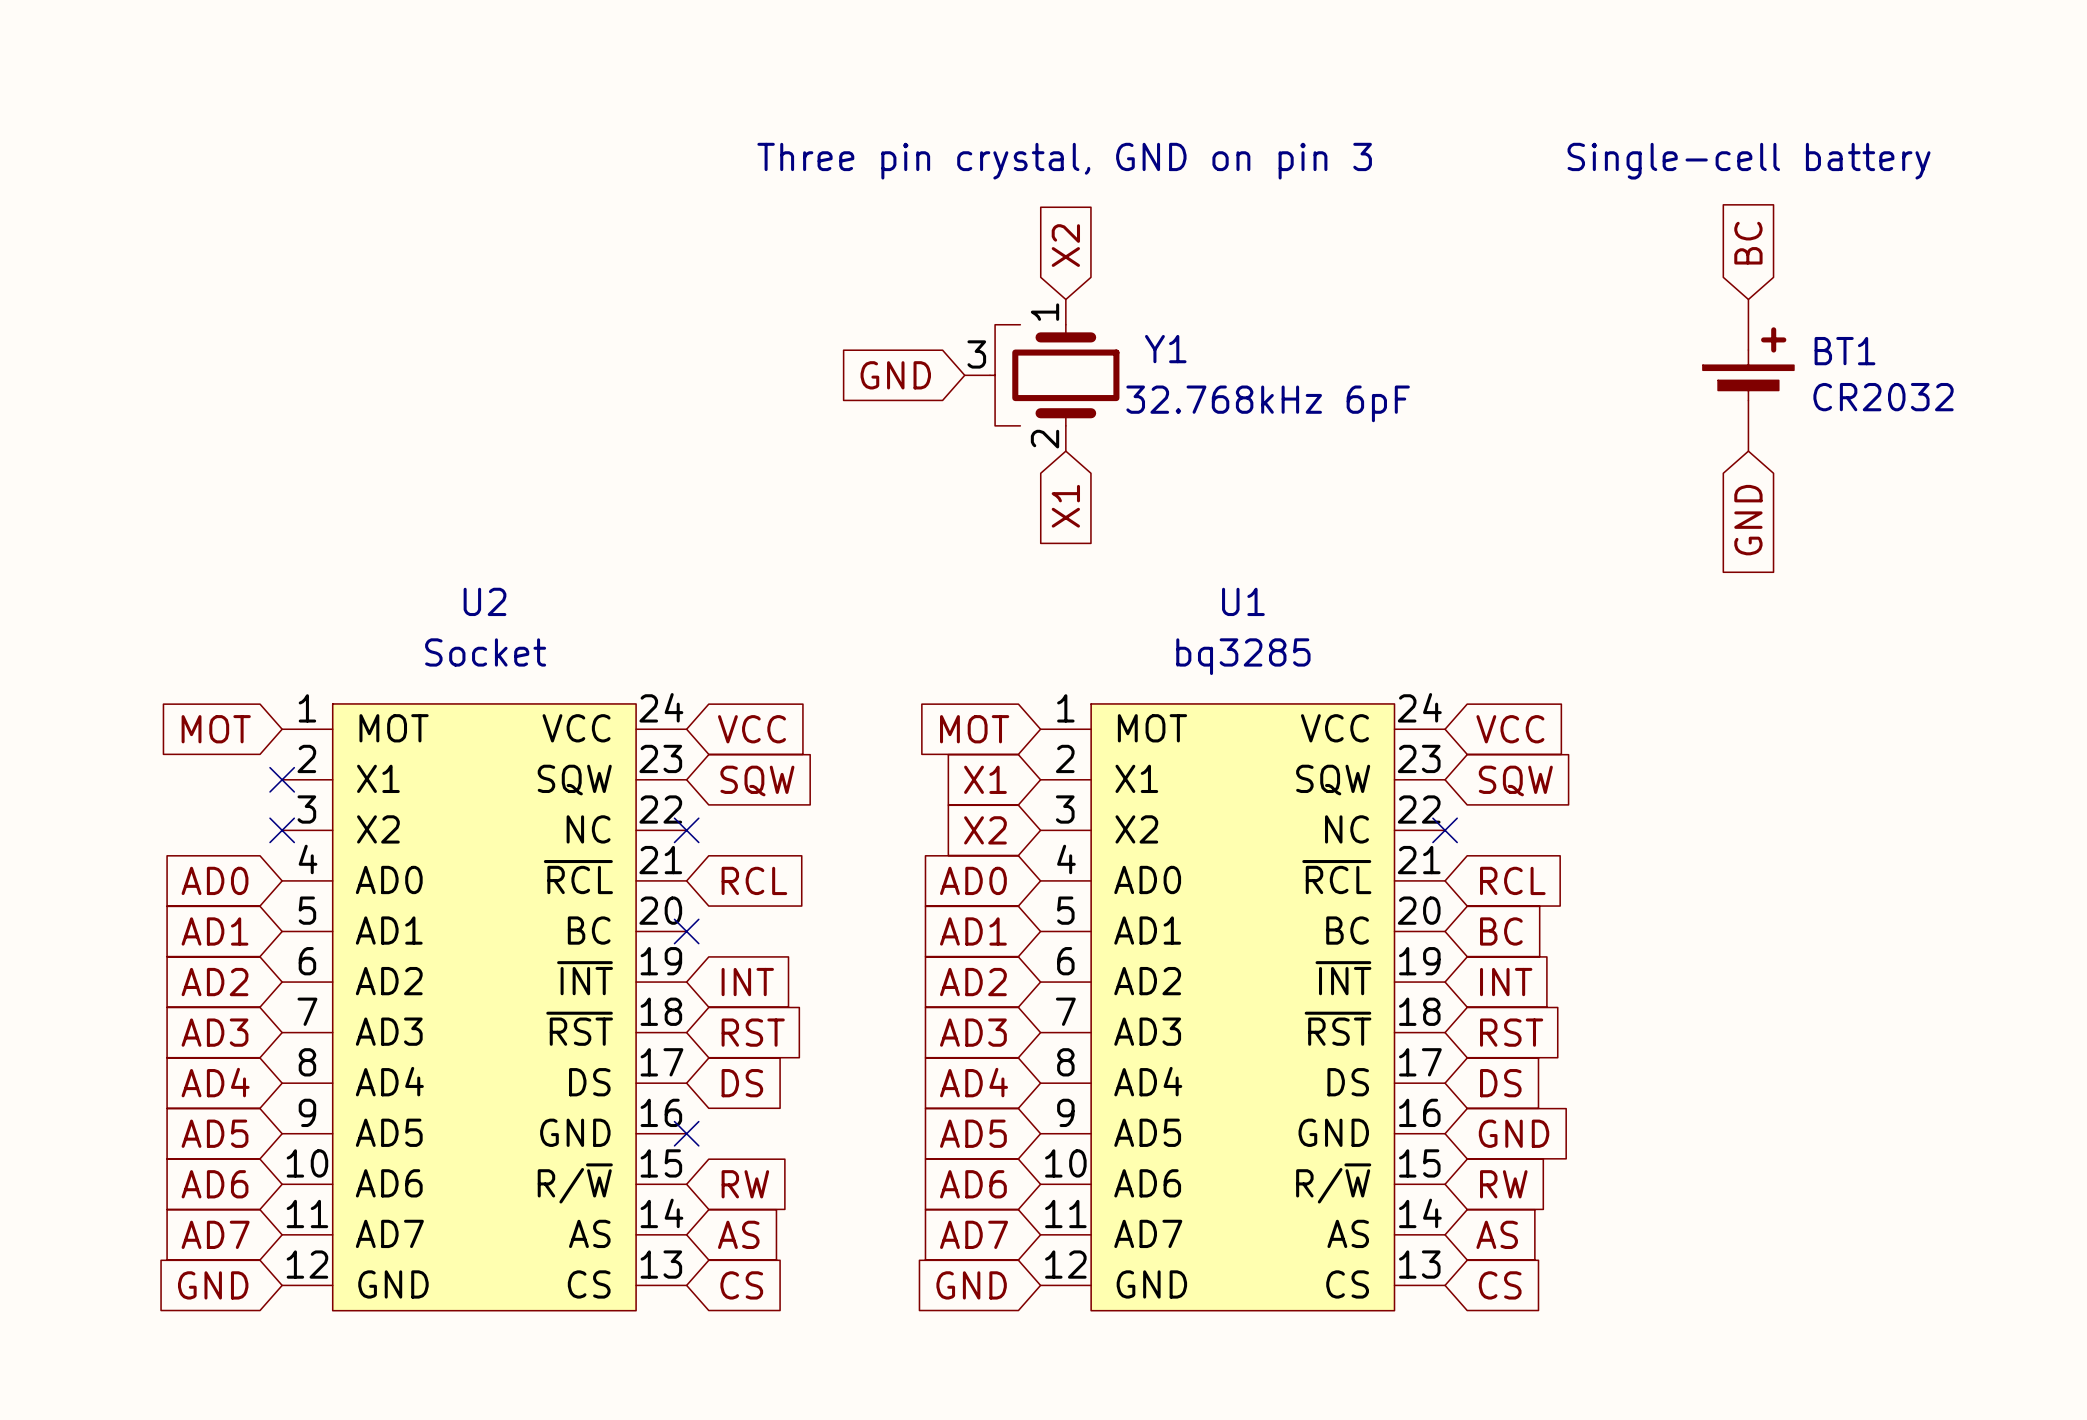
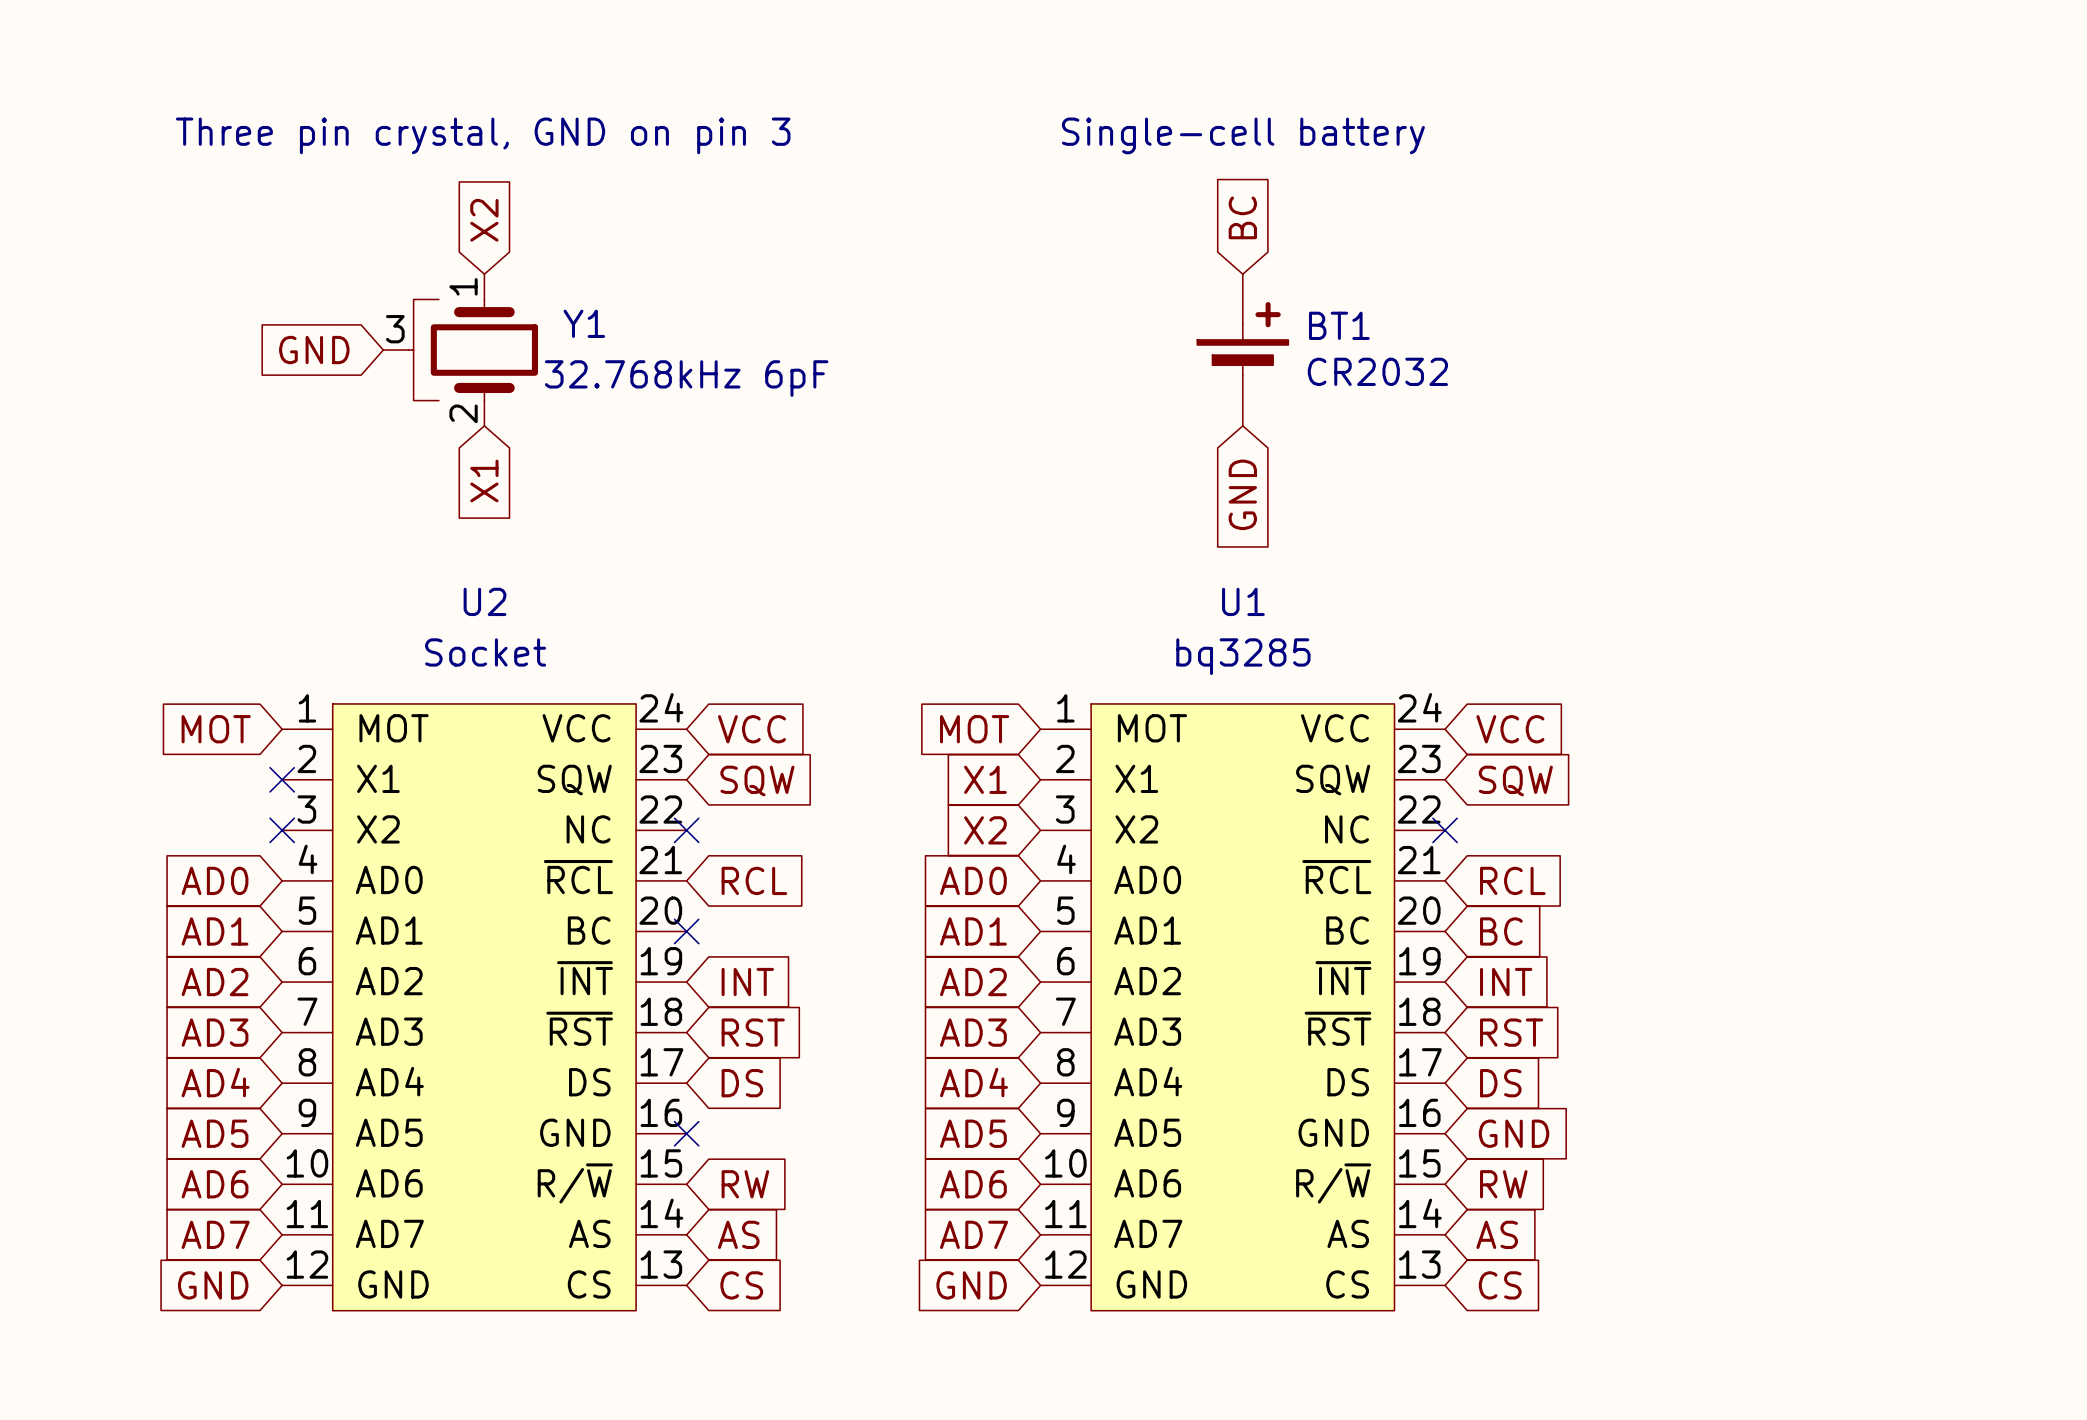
global label: none -> BC (1242, 217)
global label: none -> X2 (484, 220)
global label: BC (1748, 243) -> none
global label: X2 (1065, 245) -> none
global label: none -> GND (314, 350)
global label: GND (895, 375) -> none
Y1 position: (1042, 375) -> (460, 350)
BT1 position: (1748, 375) -> (1242, 350)
global label: none -> X1 (484, 480)
global label: none -> GND (1242, 494)
global label: X1 (1065, 506) -> none
global label: GND (1748, 520) -> none

